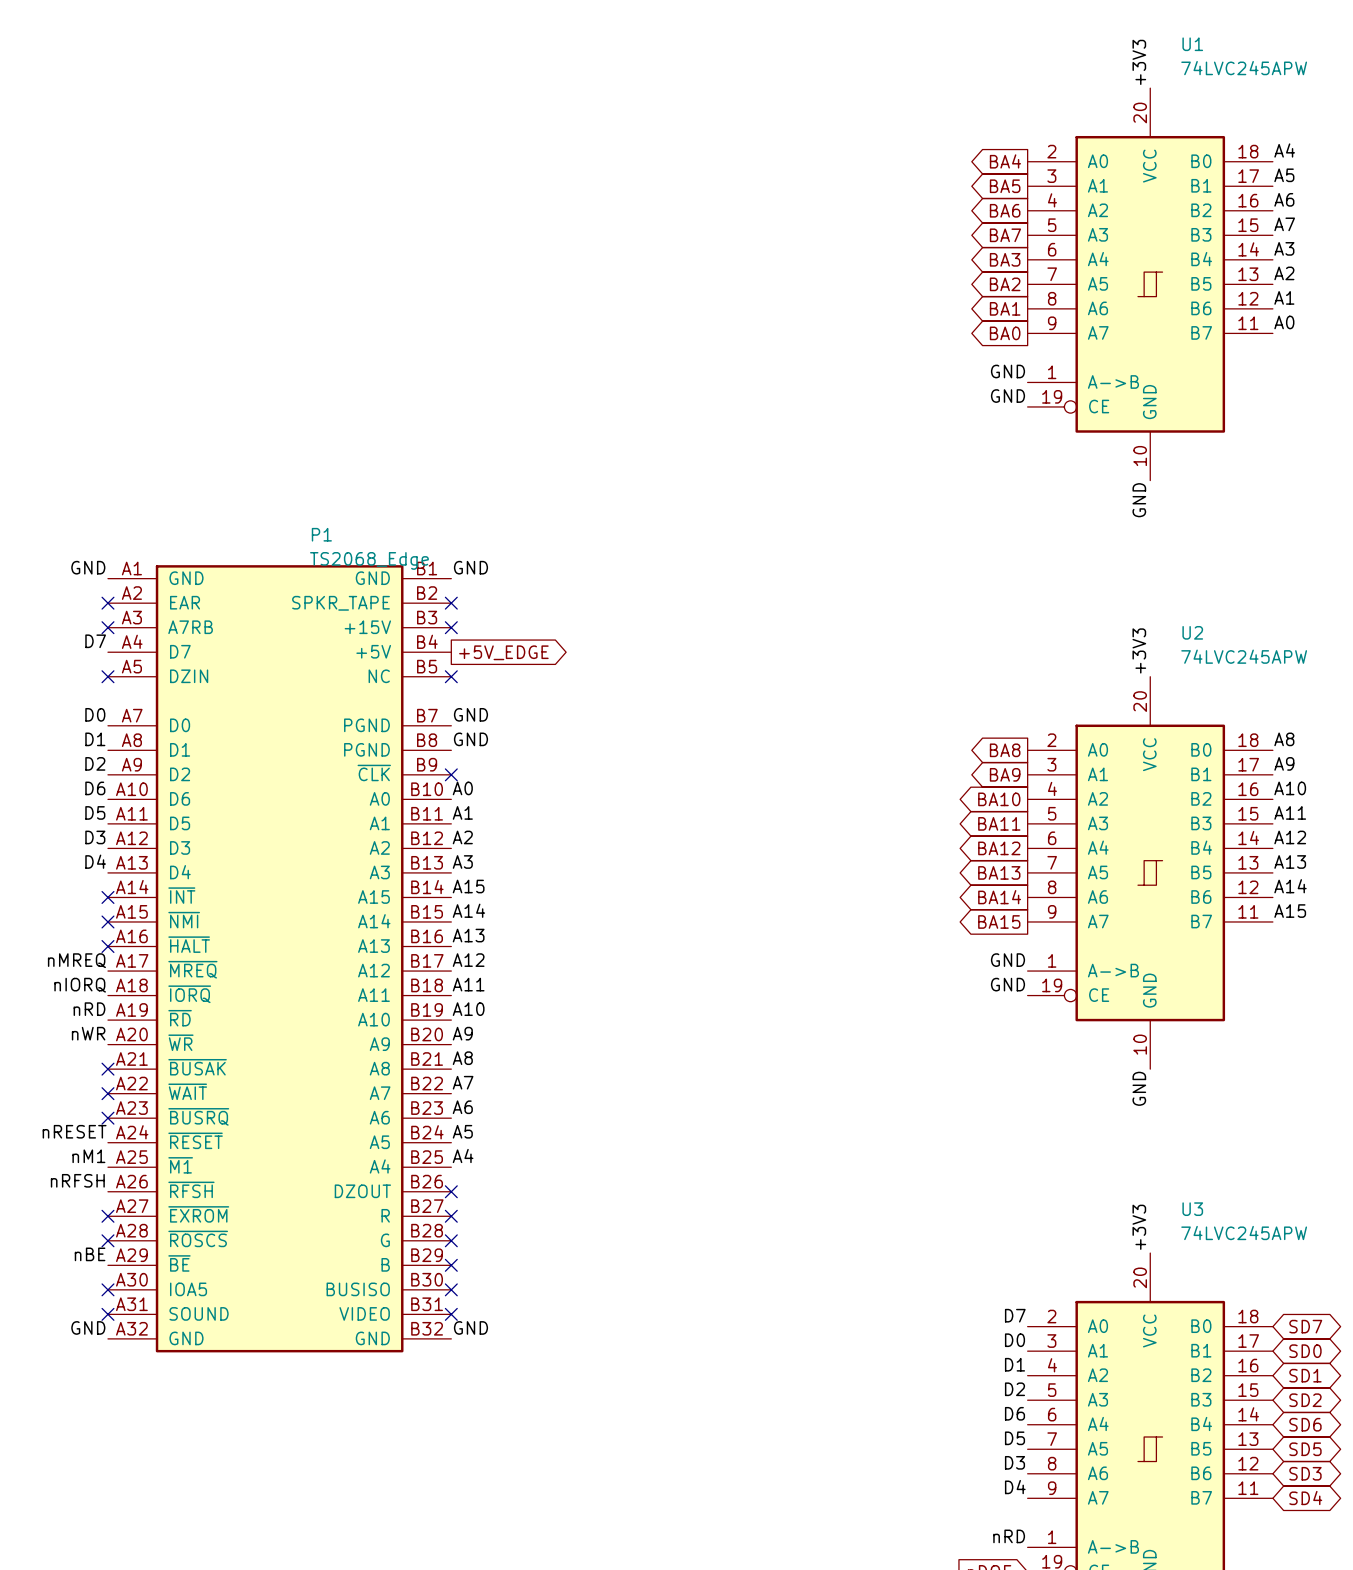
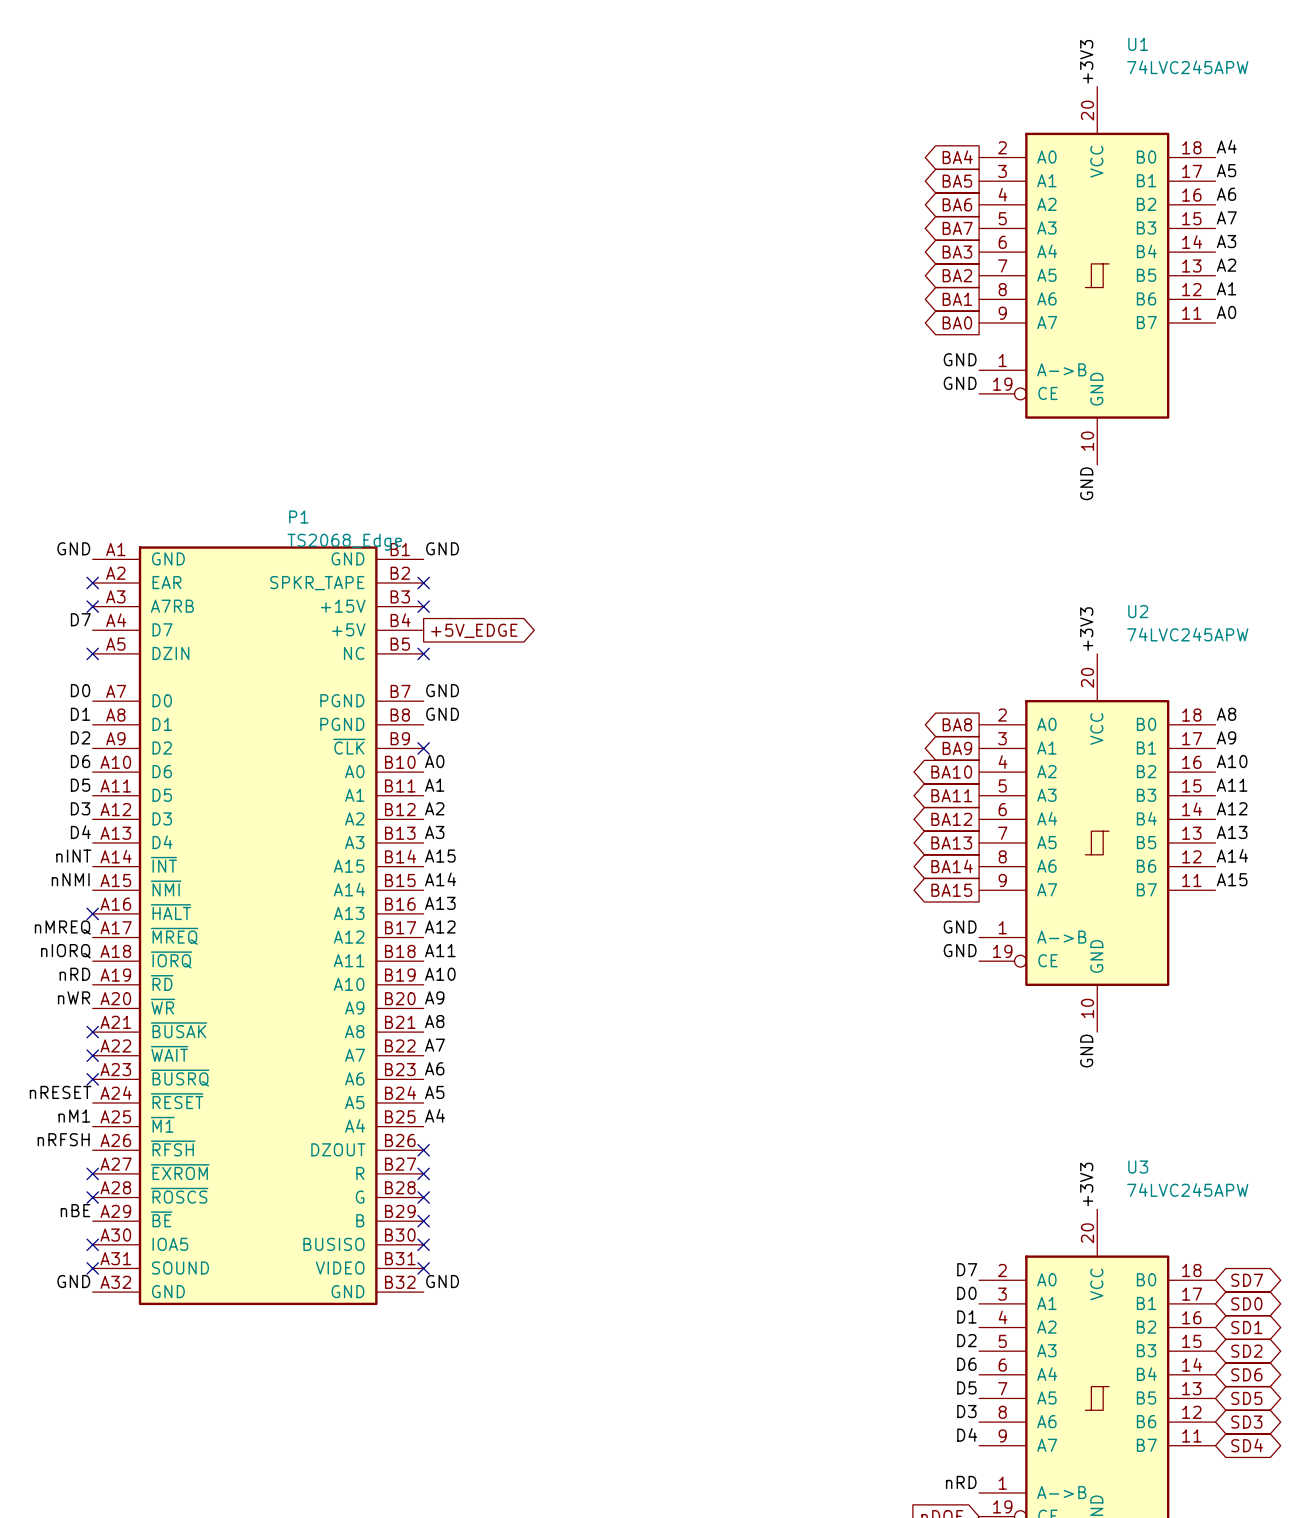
label: none -> nINT (73, 856)
no-connect mark: (107, 897) -> none
label: none -> nNMI (70, 879)
no-connect mark: (107, 921) -> none

